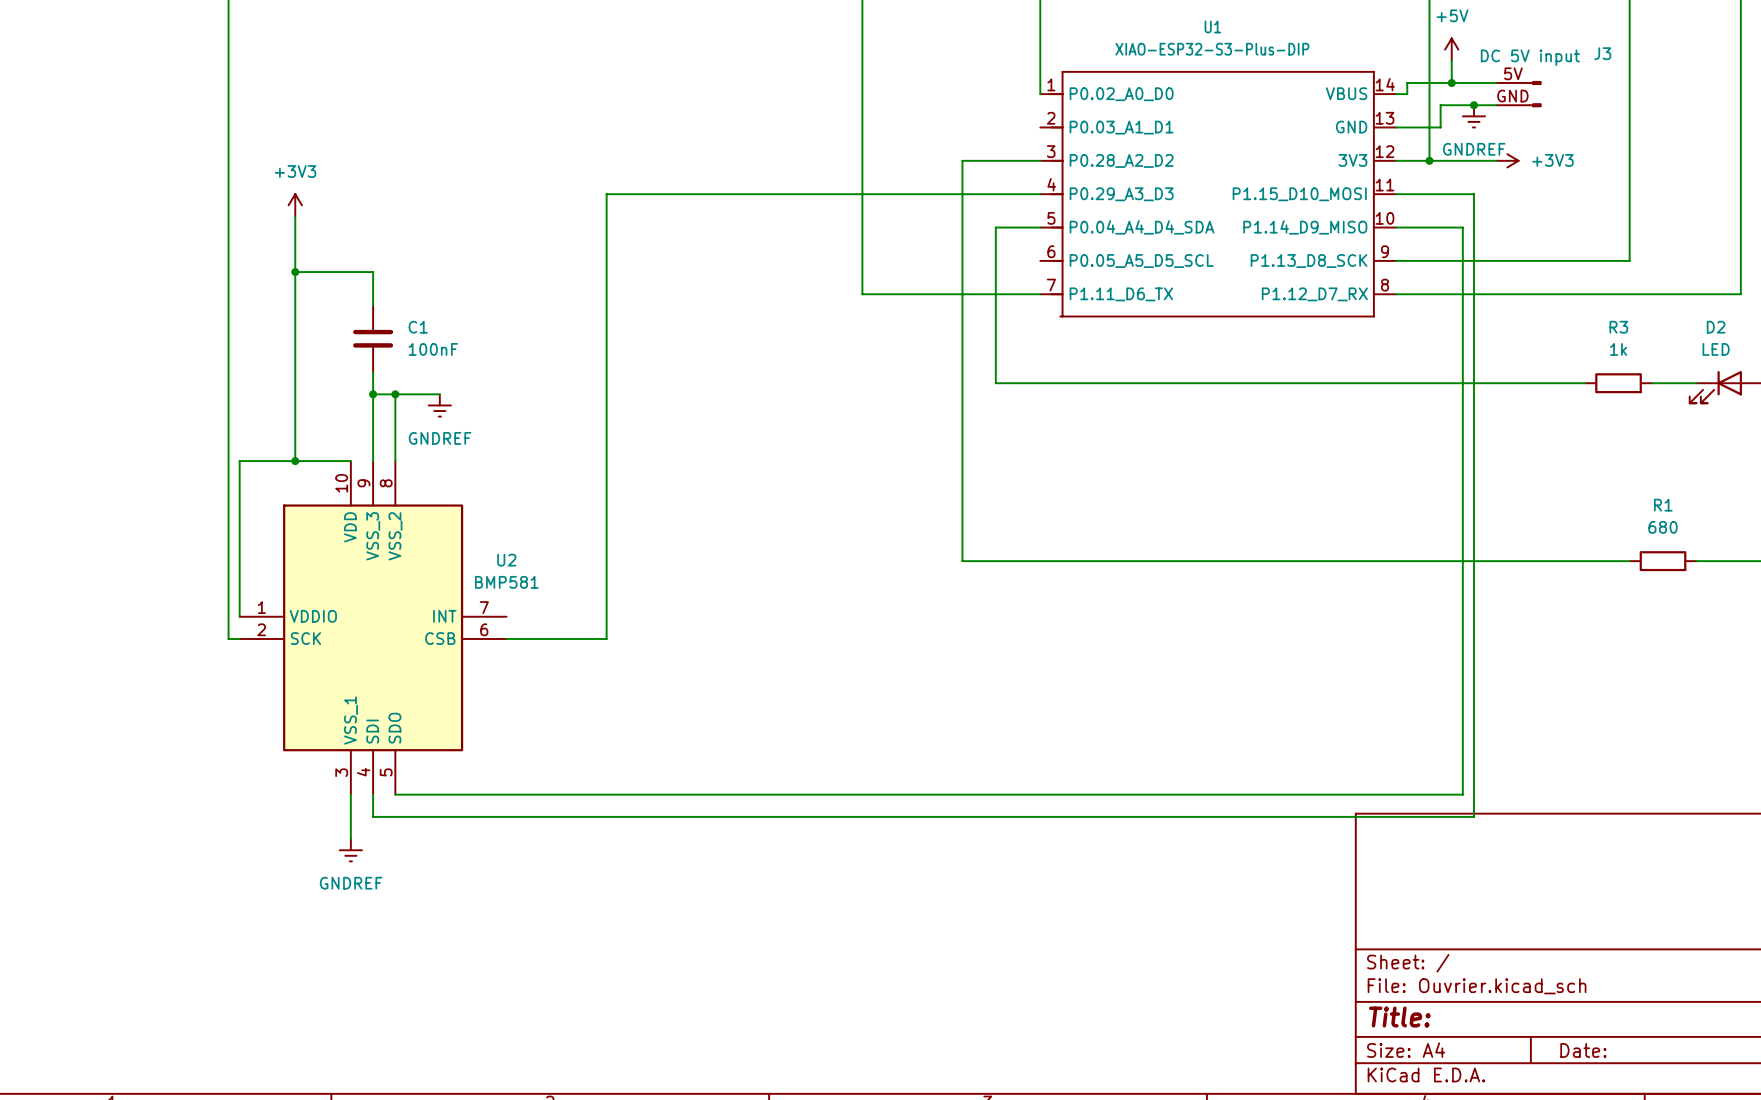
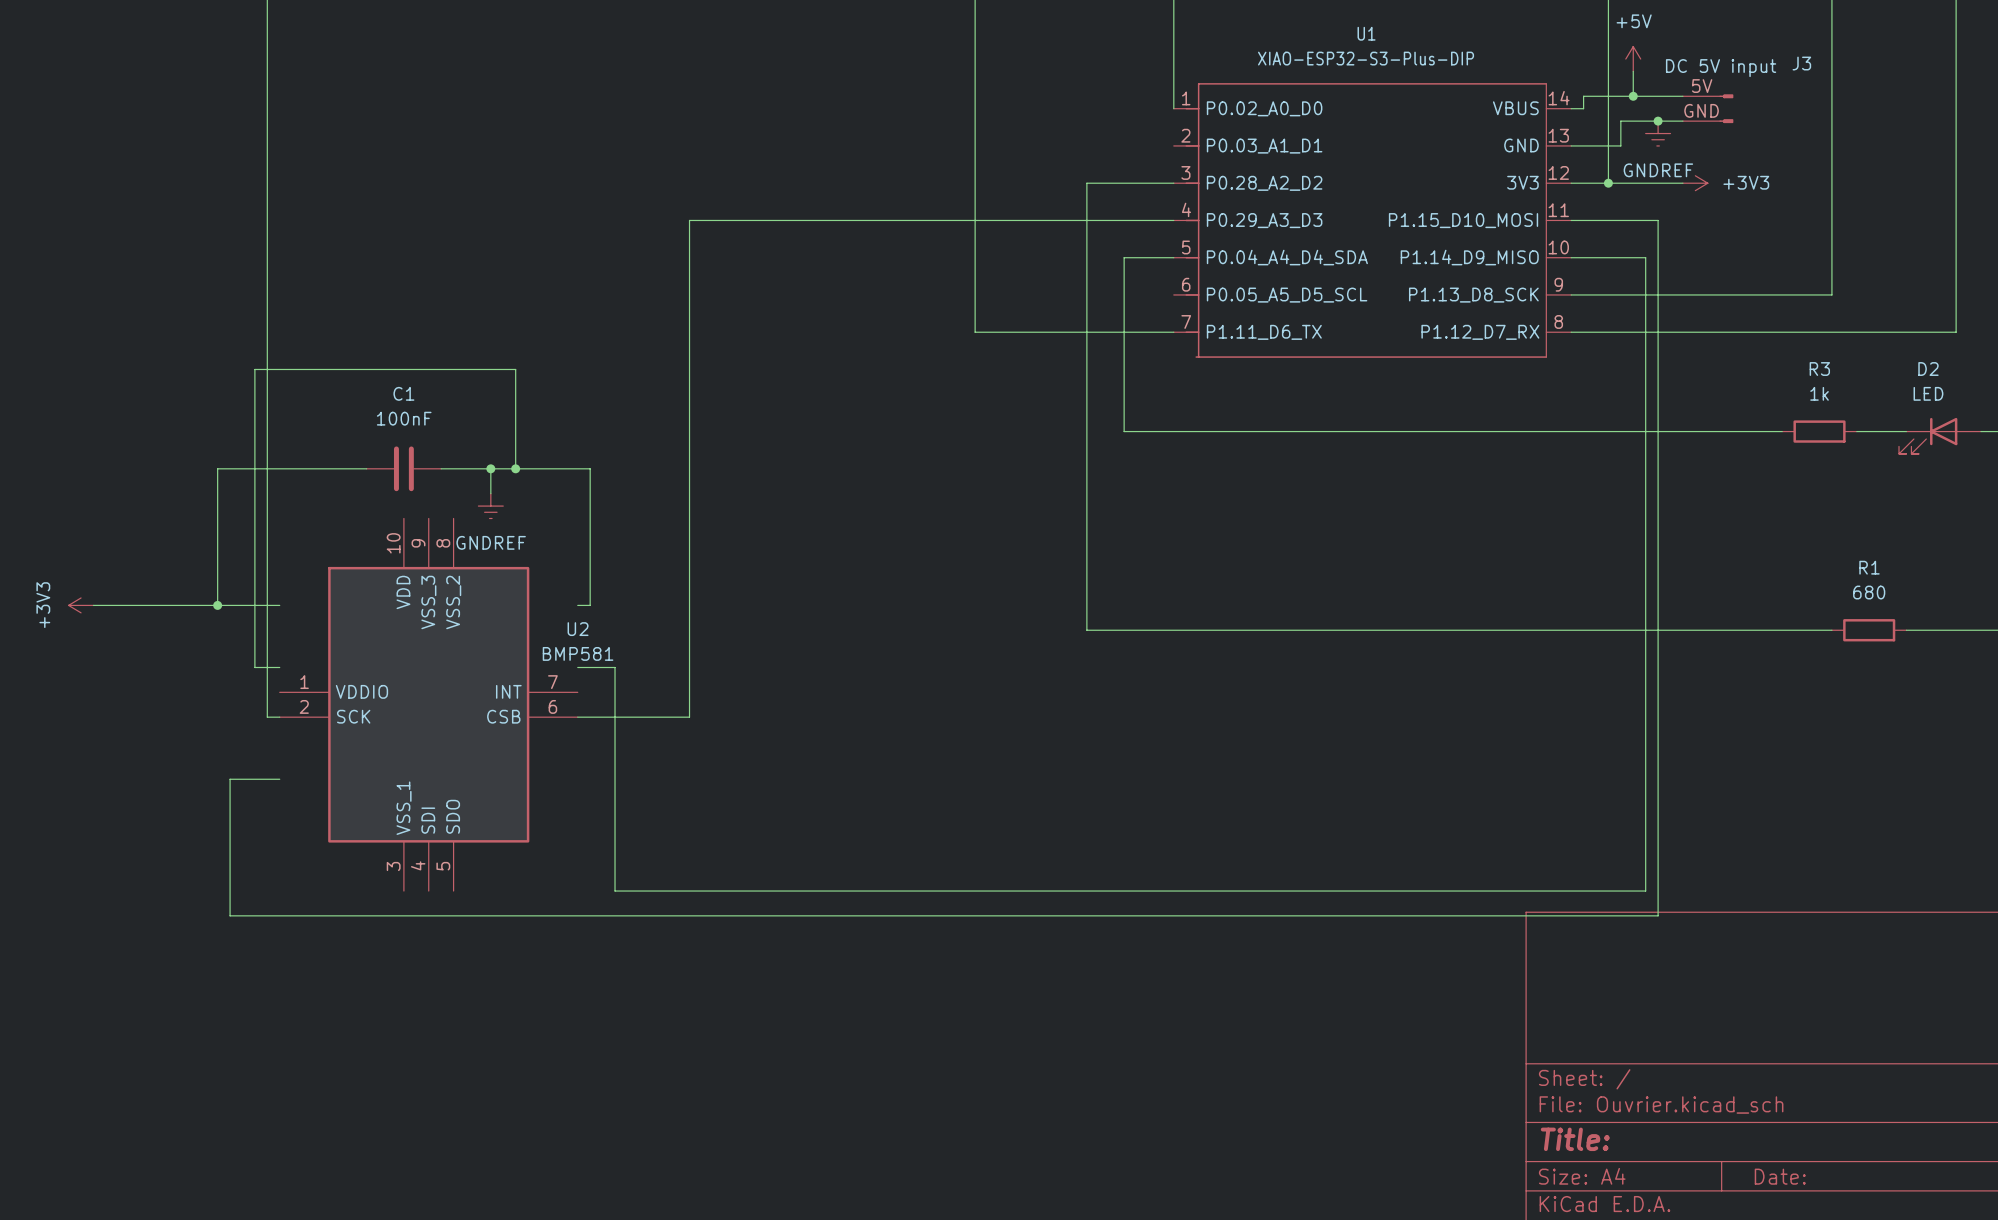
power symbol: +3V3 (295, 205) -> none
wire: (295, 216) (295, 461) -> none
wire: (295, 272) (373, 272) (373, 305) -> none
junction: (295, 272) -> none
C1 name position: C1 (418, 327) -> C1 (403, 393)
C1 rotation: 0° (373, 338) -> 90° clockwise (403, 468)
C1 position: (373, 338) -> (403, 468)
C1 value position: 100nF (433, 349) -> 100nF (404, 418)
wire: (373, 372) (373, 461) -> none
wire: (373, 394) (439, 394) -> none
junction: (373, 394) -> none
wire: (395, 394) (395, 461) -> none
junction: (395, 394) -> none
power symbol position: GNDREF (439, 405) -> GNDREF (490, 506)
wire: none -> (366, 468) (217, 468) (217, 605)
wire: none -> (441, 468) (590, 468) (590, 605) (577, 605)
wire: none -> (490, 468) (490, 493)
junction: none -> (490, 468)
wire: none -> (515, 468) (515, 369) (254, 369) (254, 667) (279, 667)
junction: none -> (515, 468)
junction: (295, 461) -> none
wire: (350, 461) (239, 461) (239, 616) -> none
power symbol: none -> +3V3 (81, 605)
wire: none -> (93, 605) (279, 605)
junction: none -> (217, 605)
wire: (350, 794) (350, 839) -> none
wire: (373, 794) (373, 816) -> (279, 779) (230, 779) (230, 915) (428, 915)
wire: (395, 794) (539, 794) -> (577, 667) (615, 667) (615, 891)
power symbol: GNDREF (350, 850) -> none

